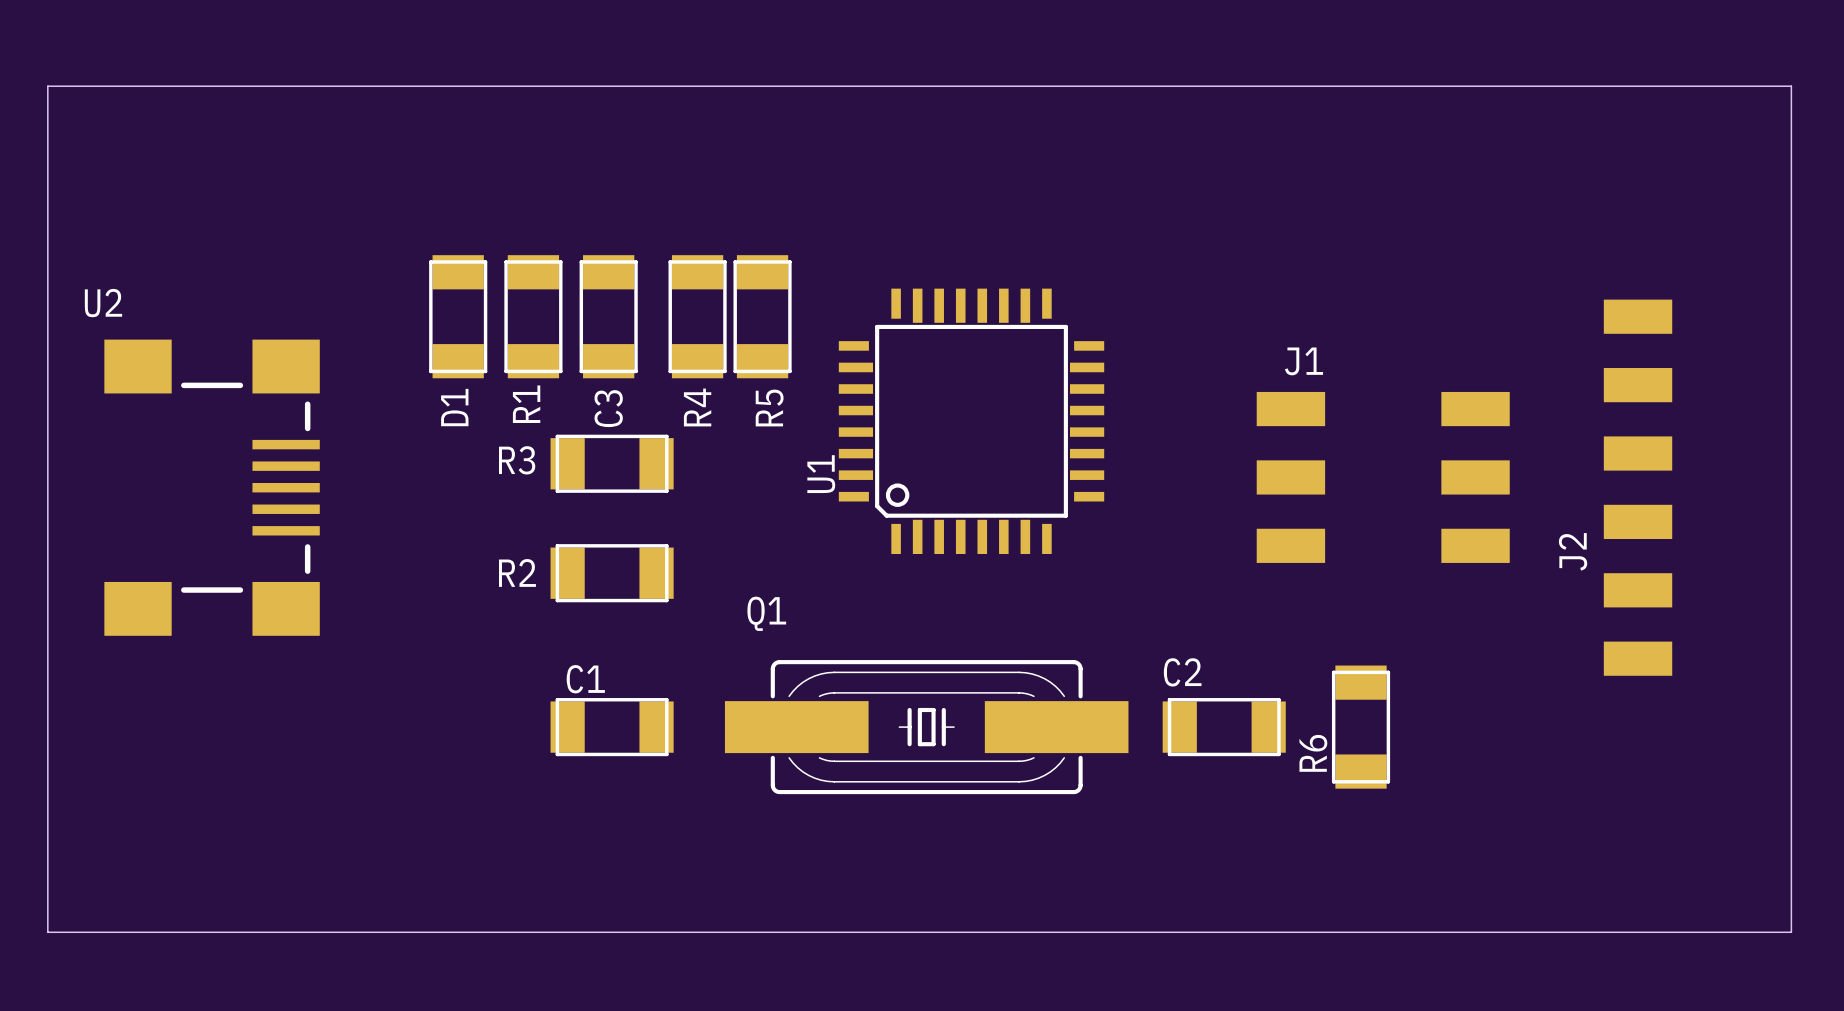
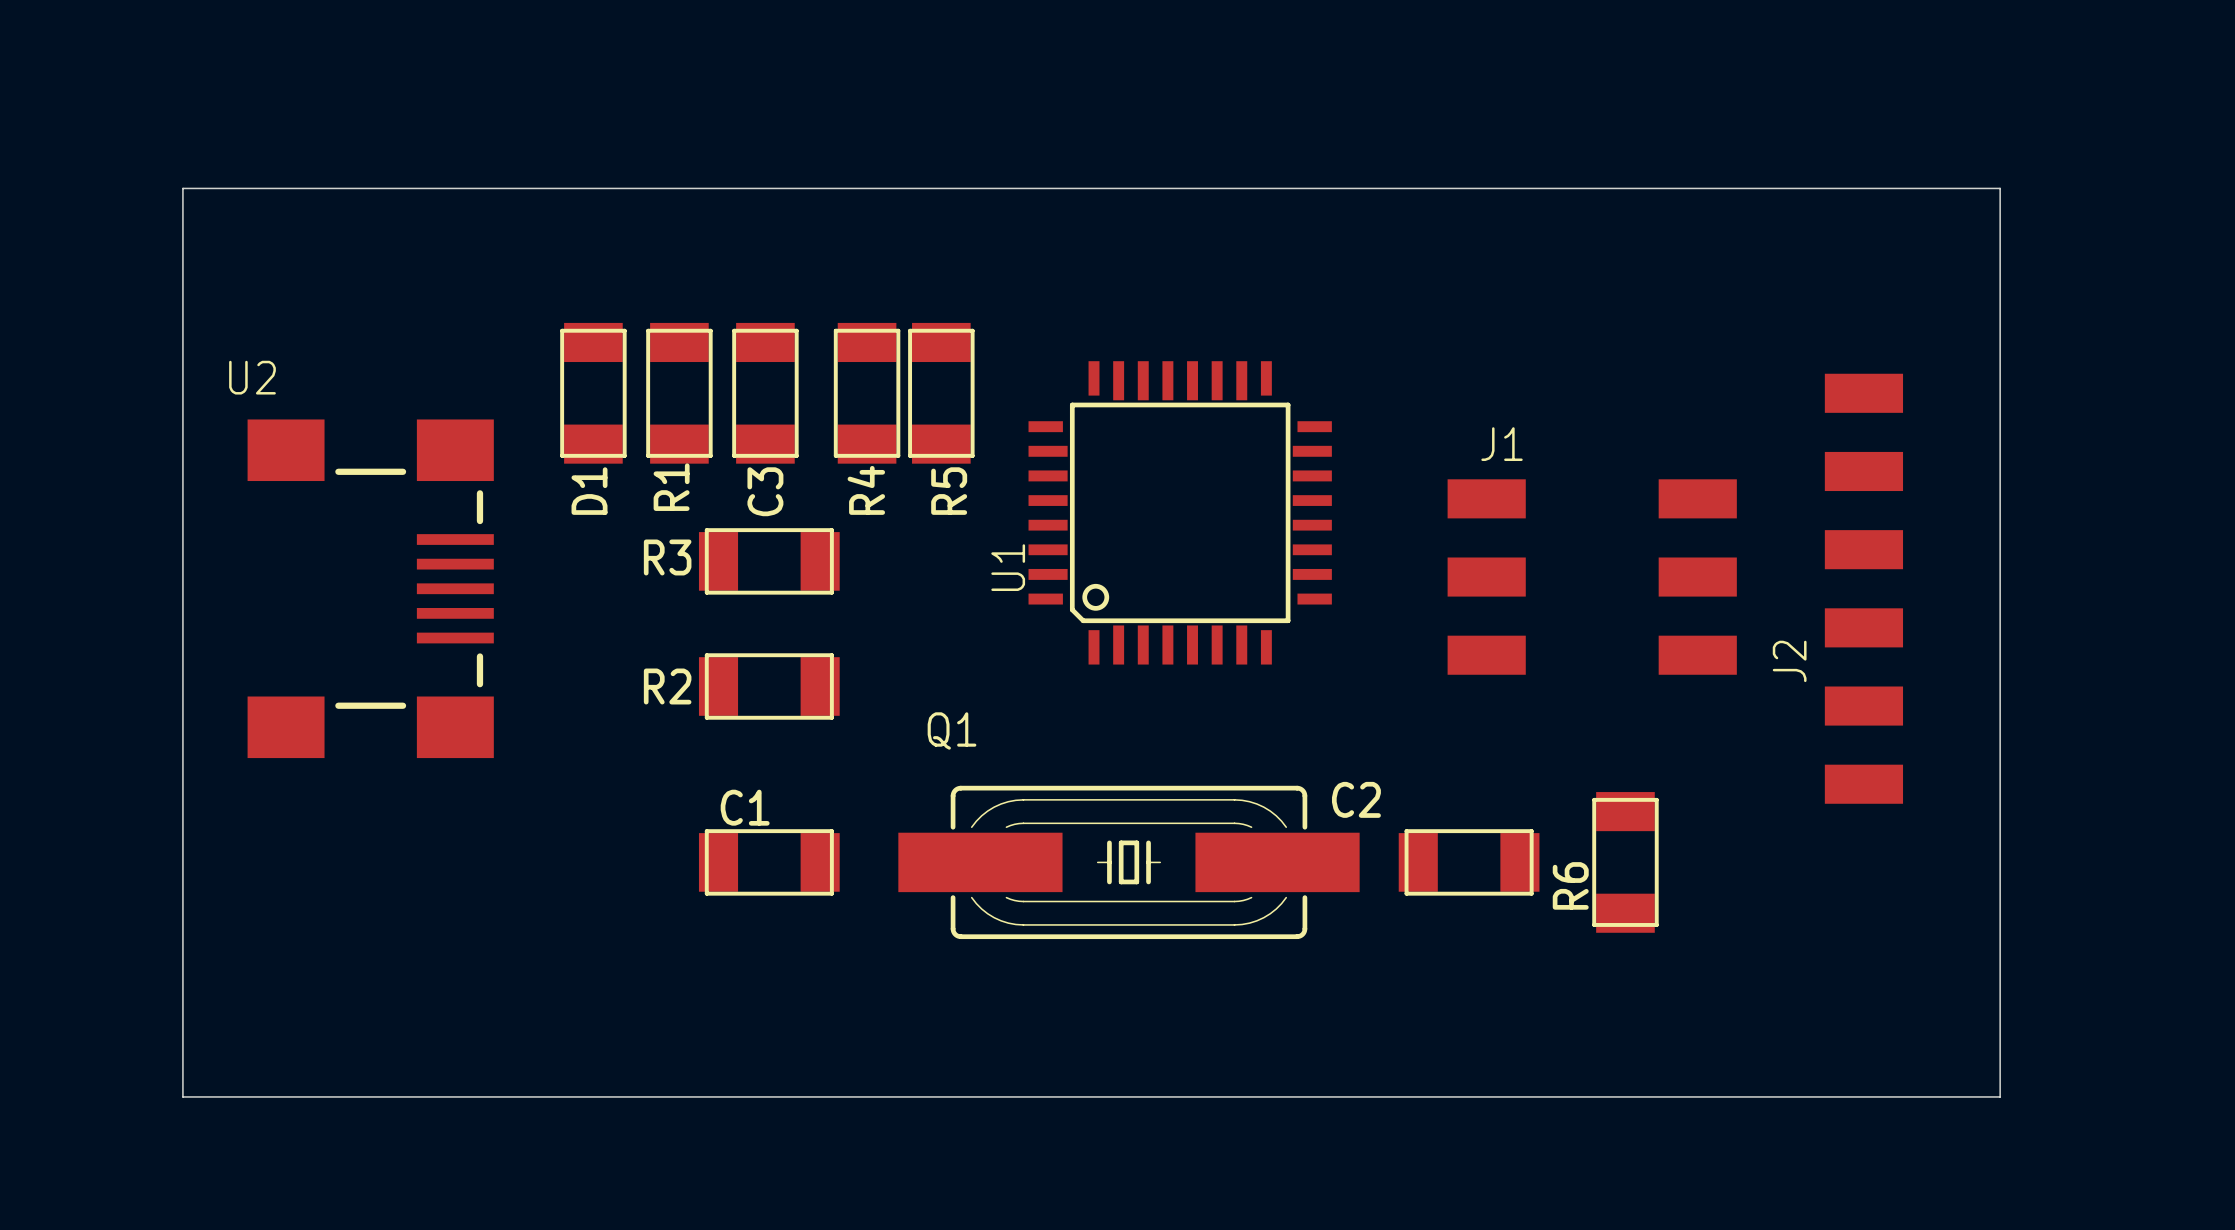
J1 position: (1383, 477) -> (1592, 577)
U2 position: (212, 487) -> (370, 588)
J2 position: (1638, 487) -> (1863, 588)
C2 name position: C2 (1182, 672) -> C2 (1356, 799)
board edge: (99, 932) (47, 932) (47, 86) (1791, 86) (1791, 932) (1688, 932) -> (182, 1096) (182, 188) (2000, 188) (2000, 1096)

